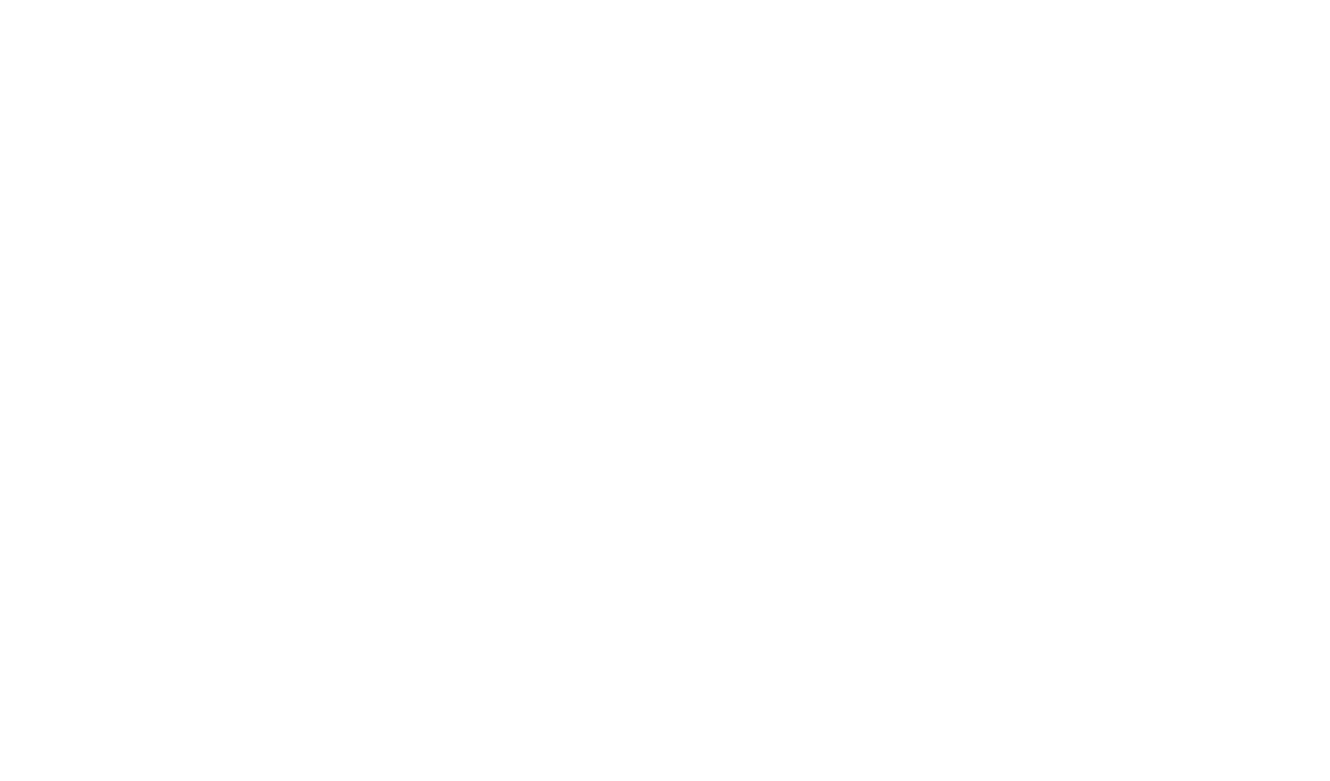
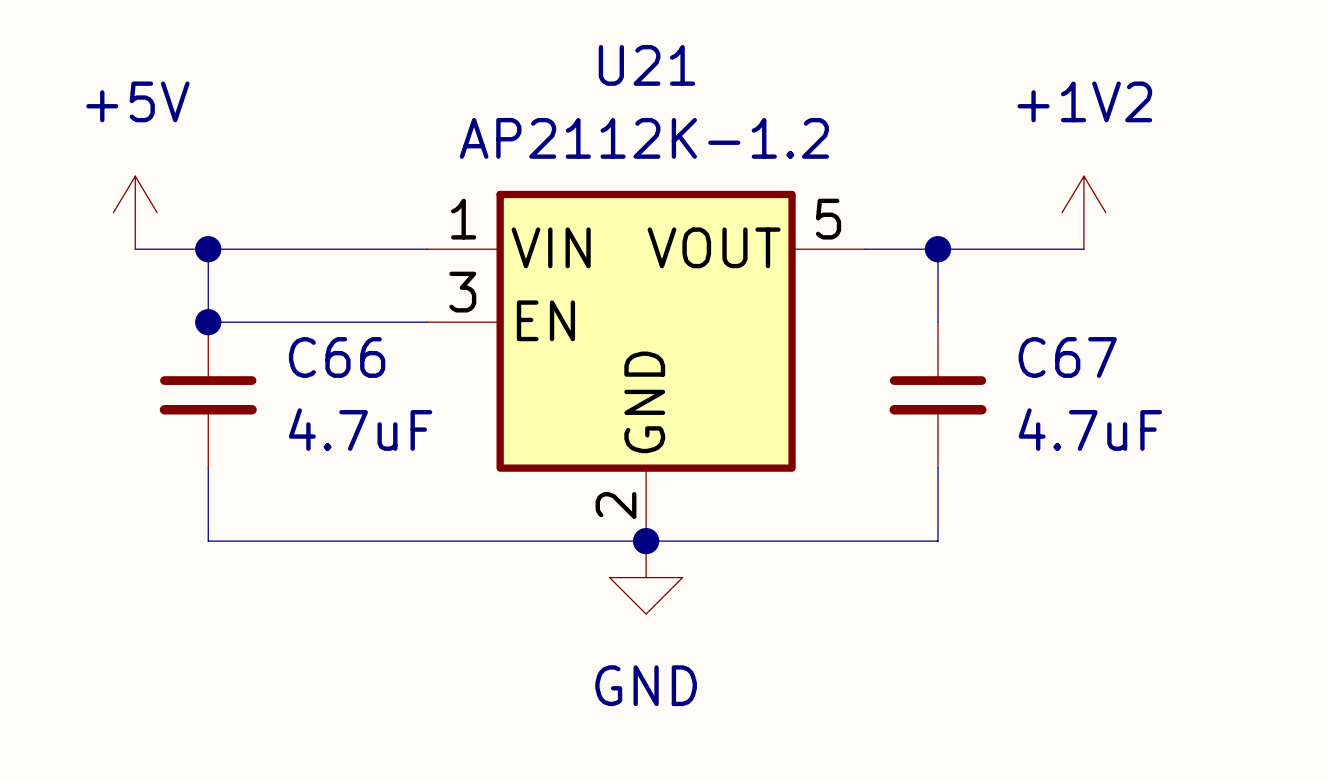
power symbol: none -> +5V (135, 212)
power symbol: none -> +1V2 (1083, 212)
wire: none -> (135, 249) (427, 249)
wire: none -> (208, 249) (208, 322) (427, 322)
junction: none -> (208, 249)
wire: none -> (865, 249) (1083, 249)
wire: none -> (938, 249) (938, 322)
junction: none -> (938, 249)
junction: none -> (208, 322)
U21: none -> AP2112K-1.2 (646, 365)
C66: none -> 4.7uF (208, 395)
C67: none -> 4.7uF (938, 395)
wire: none -> (208, 468) (208, 541) (938, 541) (938, 468)
junction: none -> (646, 541)
power symbol: none -> GND (646, 577)

